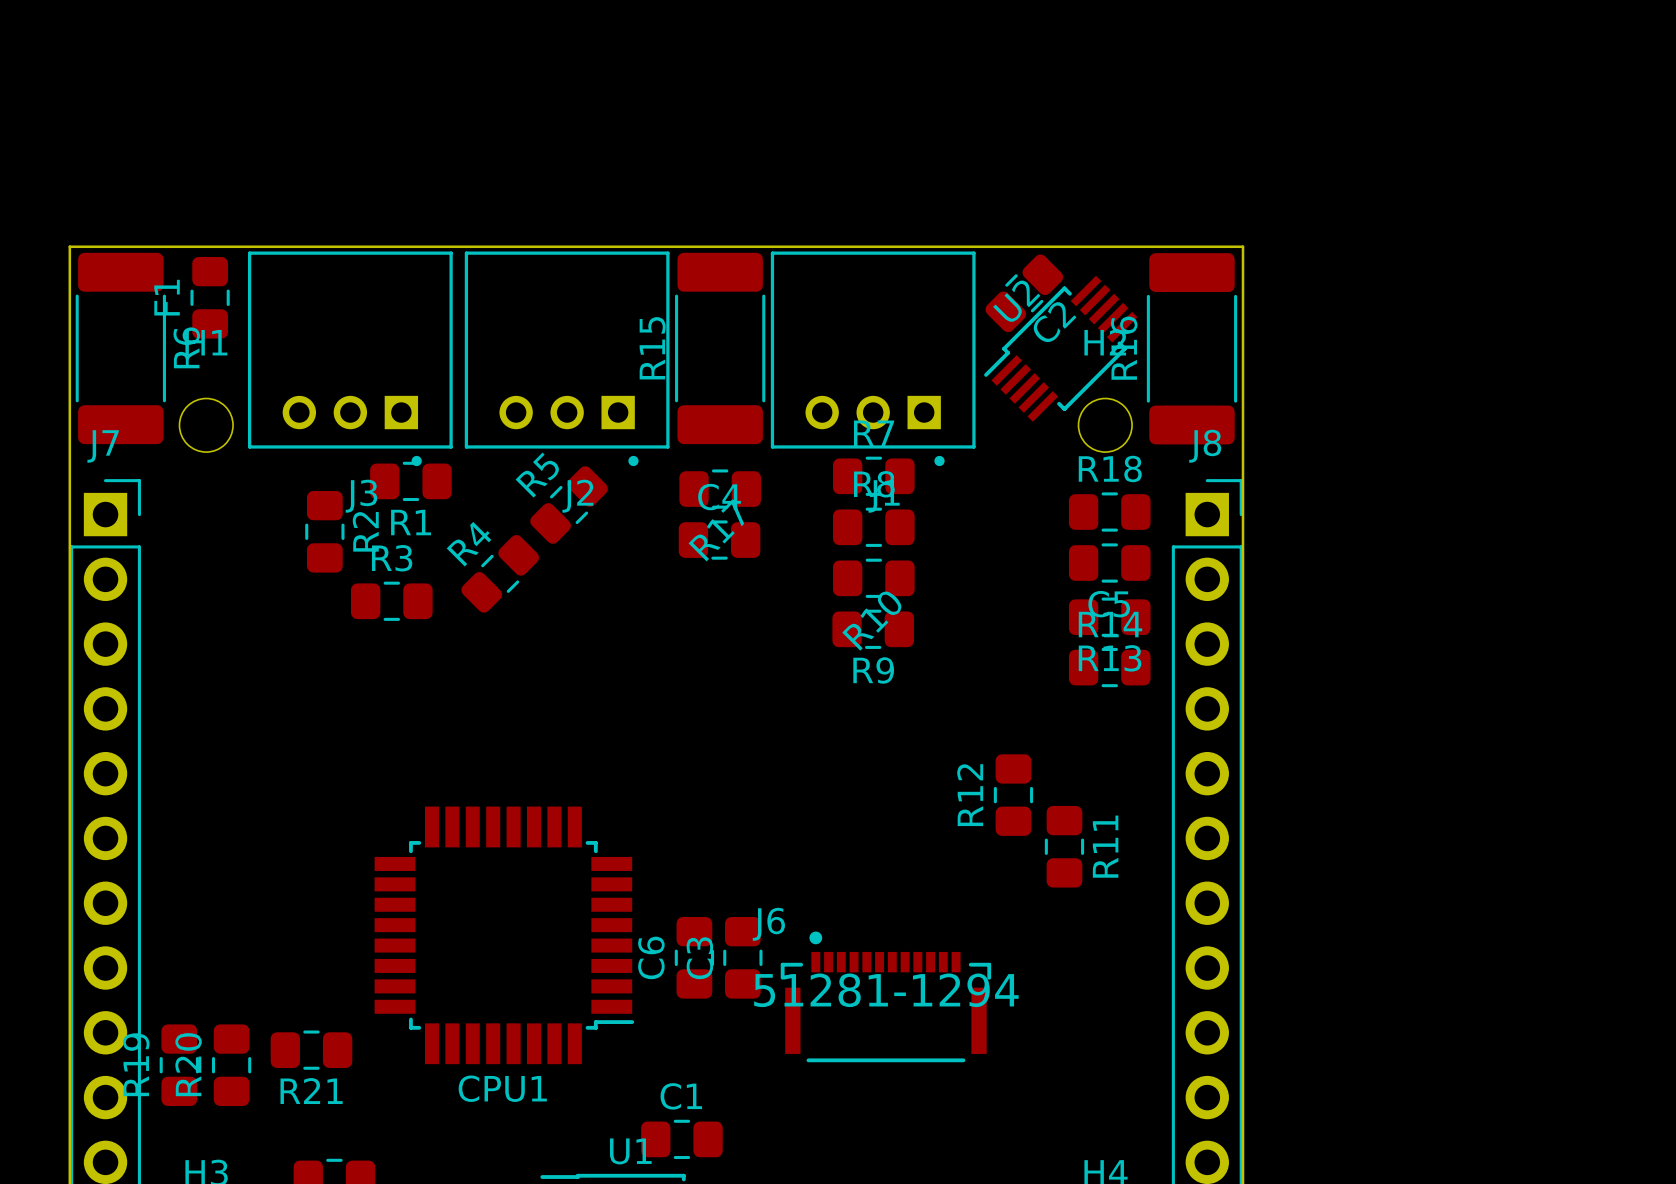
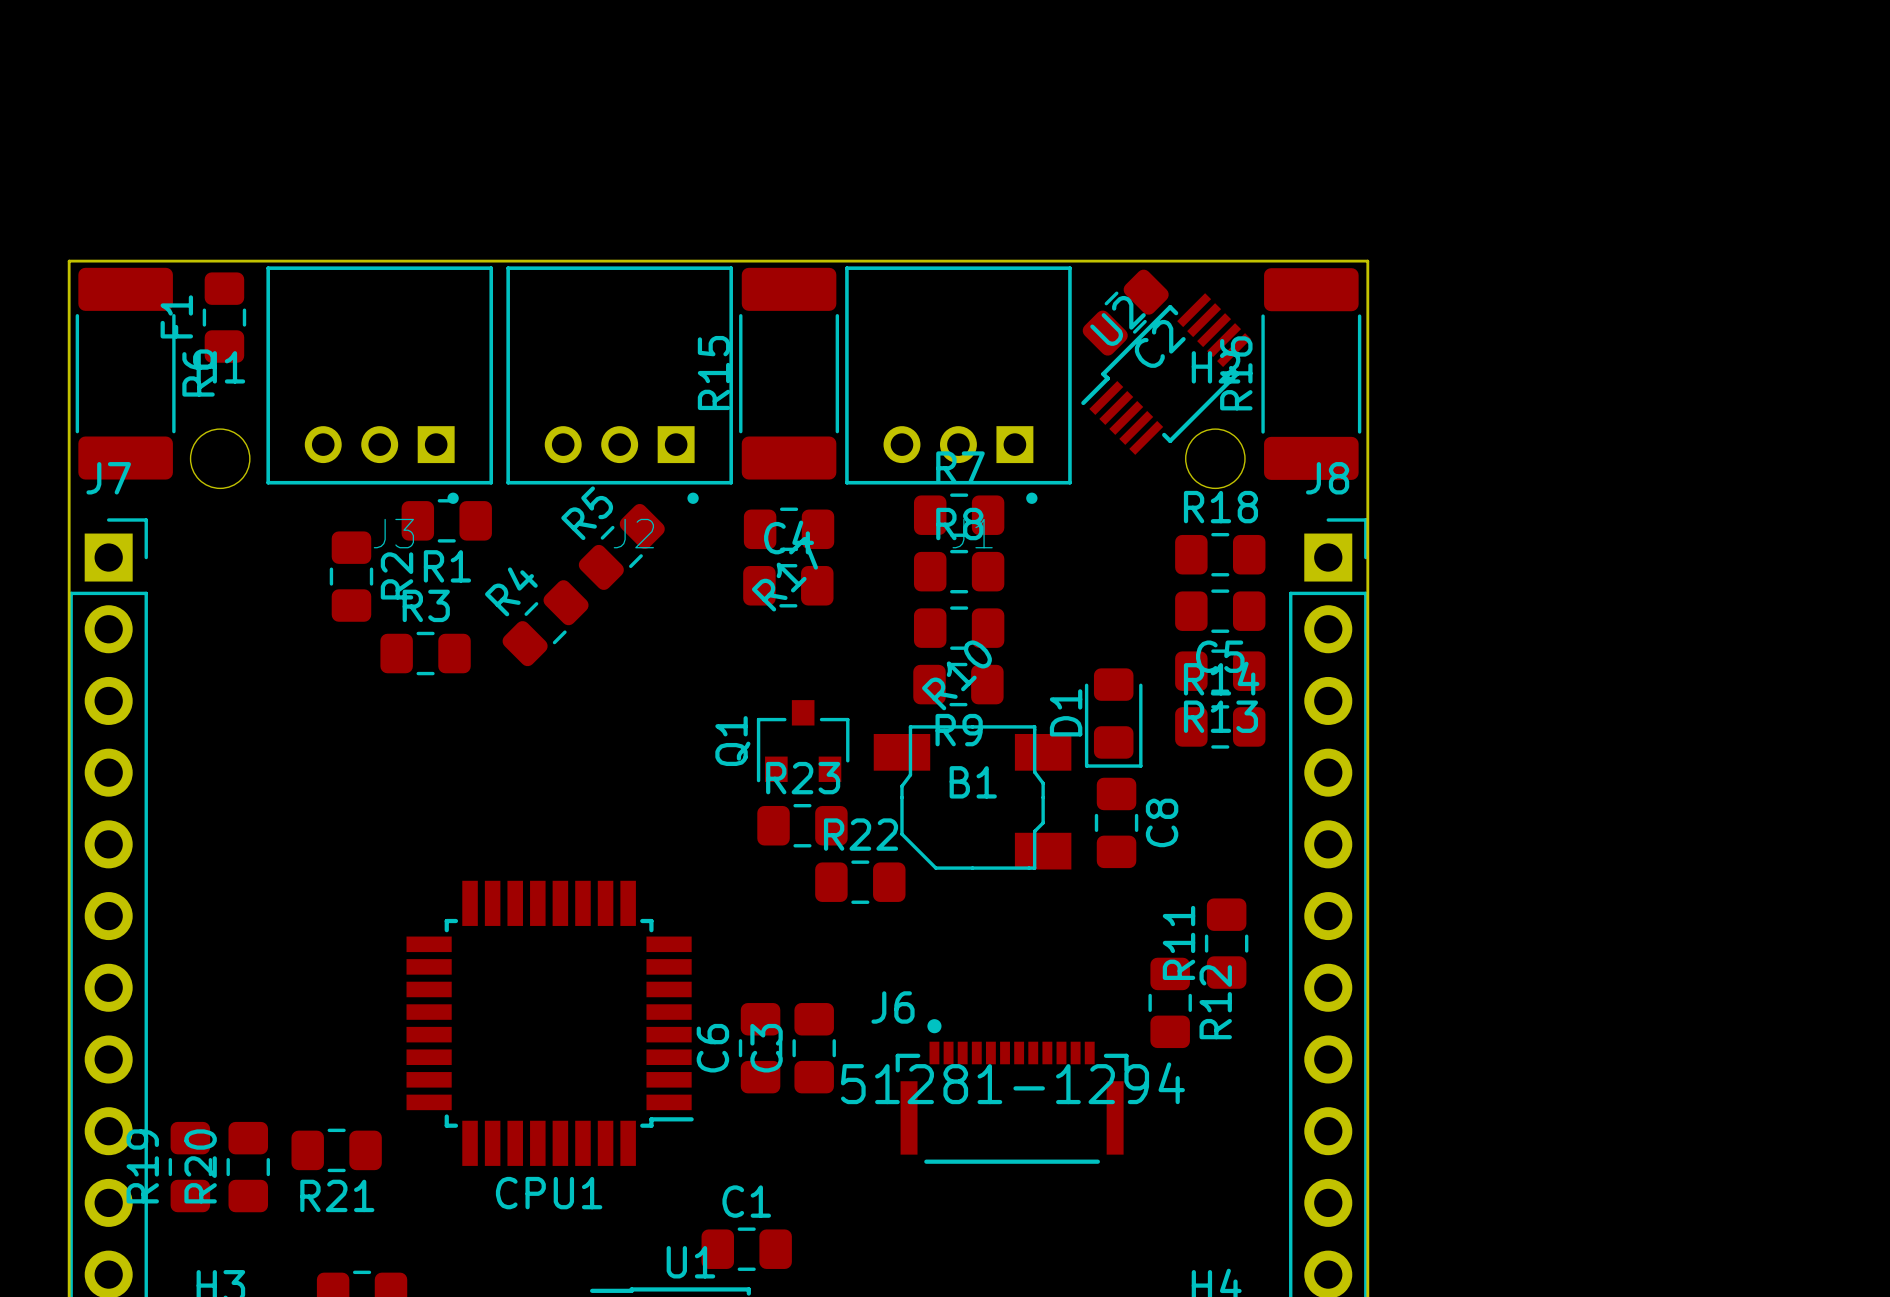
D1: none -> (1113, 718)
Q1: none -> (803, 741)
B1: none -> (972, 797)
C8: none -> (1116, 822)
R23: none -> (802, 825)
R12 name position: R12 (970, 795) -> R12 (1215, 1002)
R12 position: (1013, 795) -> (1170, 1002)
R22: none -> (860, 882)
R11 position: (1064, 846) -> (1226, 943)
R11 name position: R11 (1105, 846) -> R11 (1179, 942)
J6 position: (885, 996) -> (1012, 1091)

